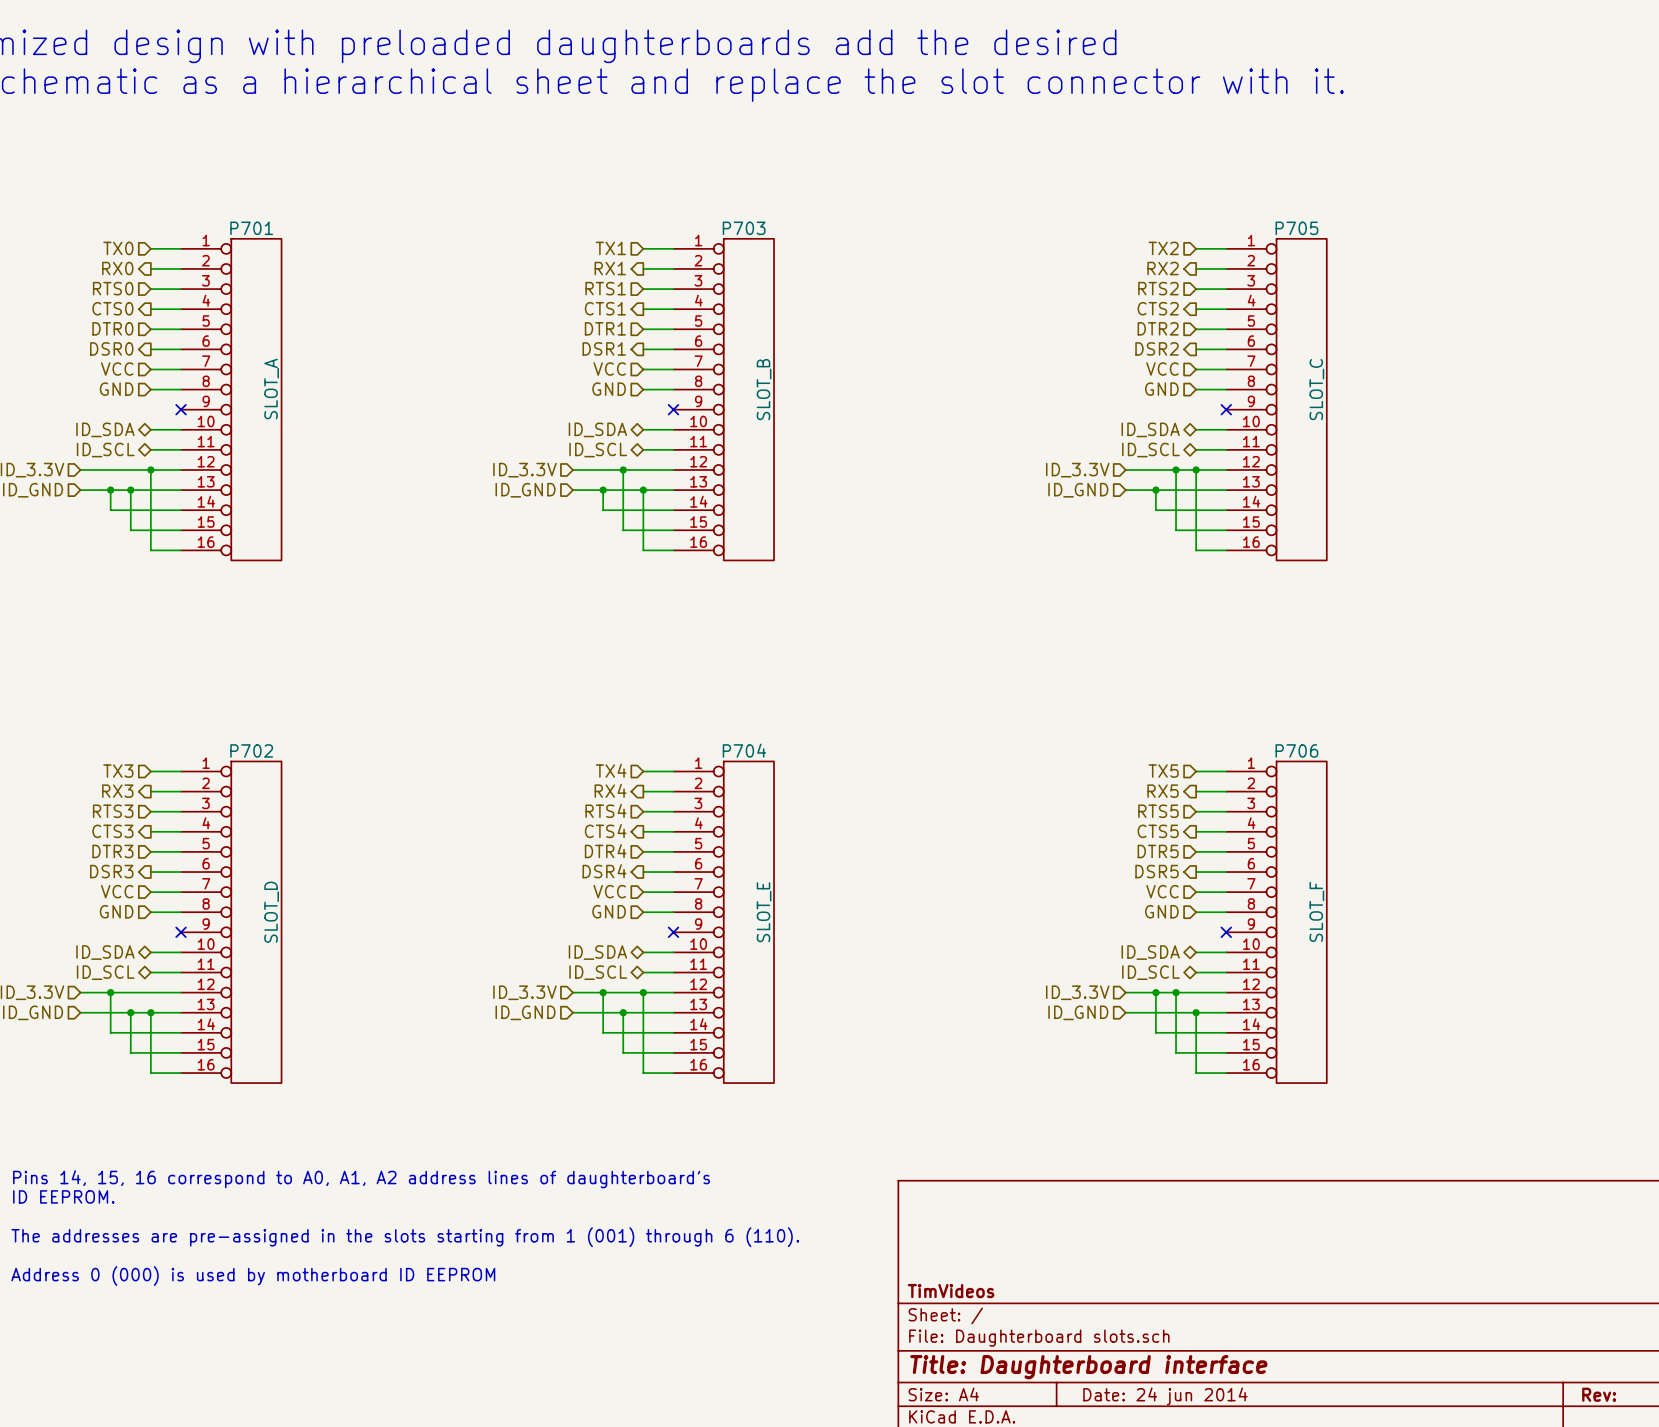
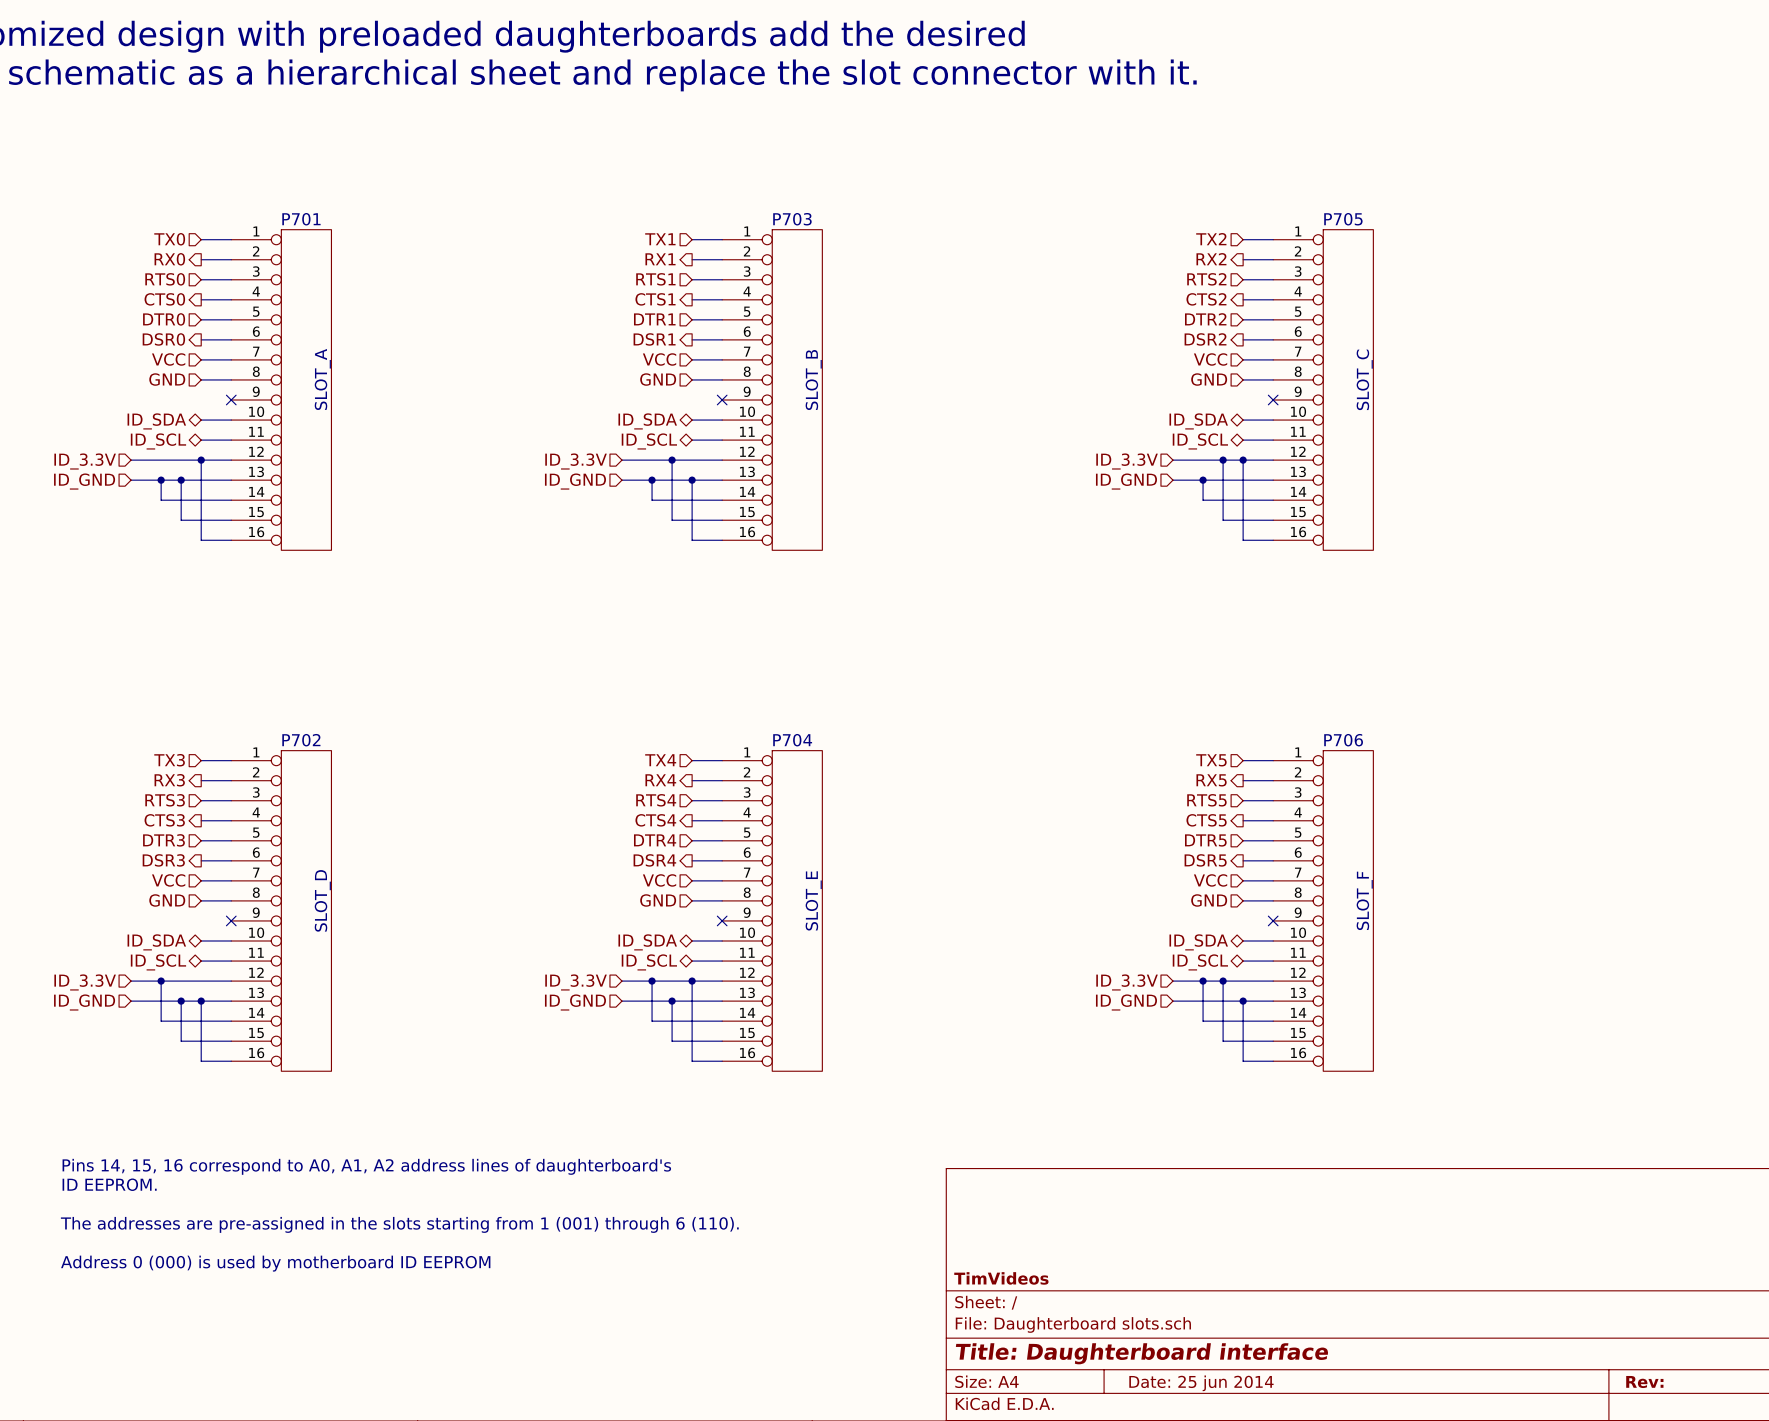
title block: Date: 24 jun 2014 (1165, 1396) -> Date: 25 jun 2014 (1201, 1383)

